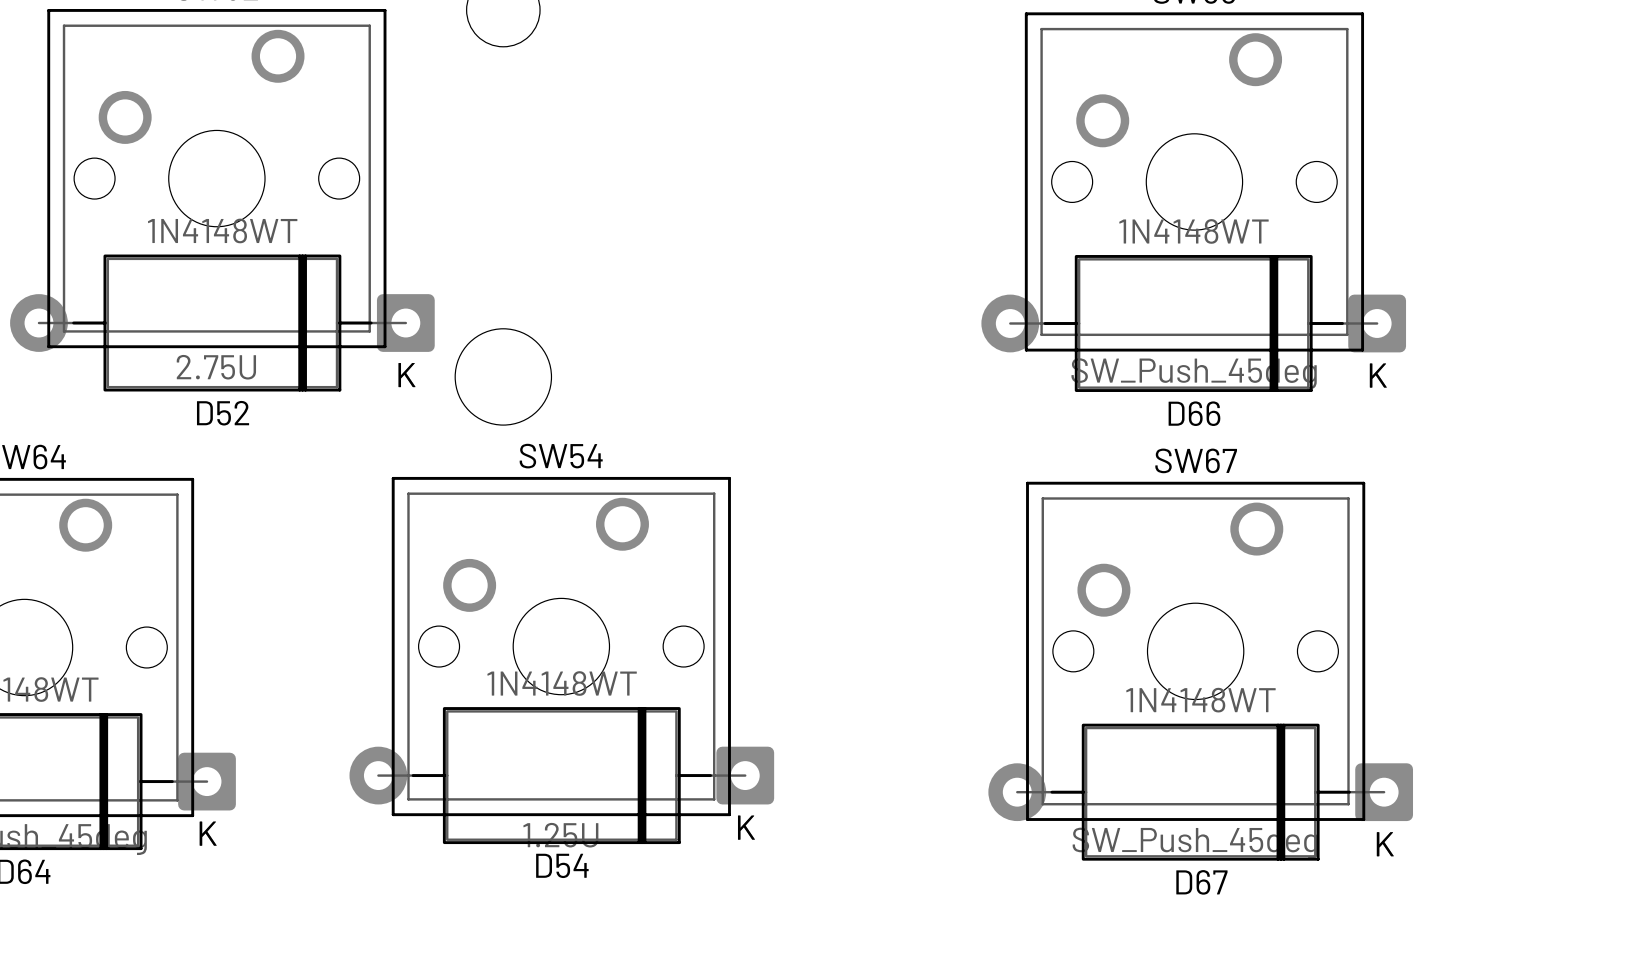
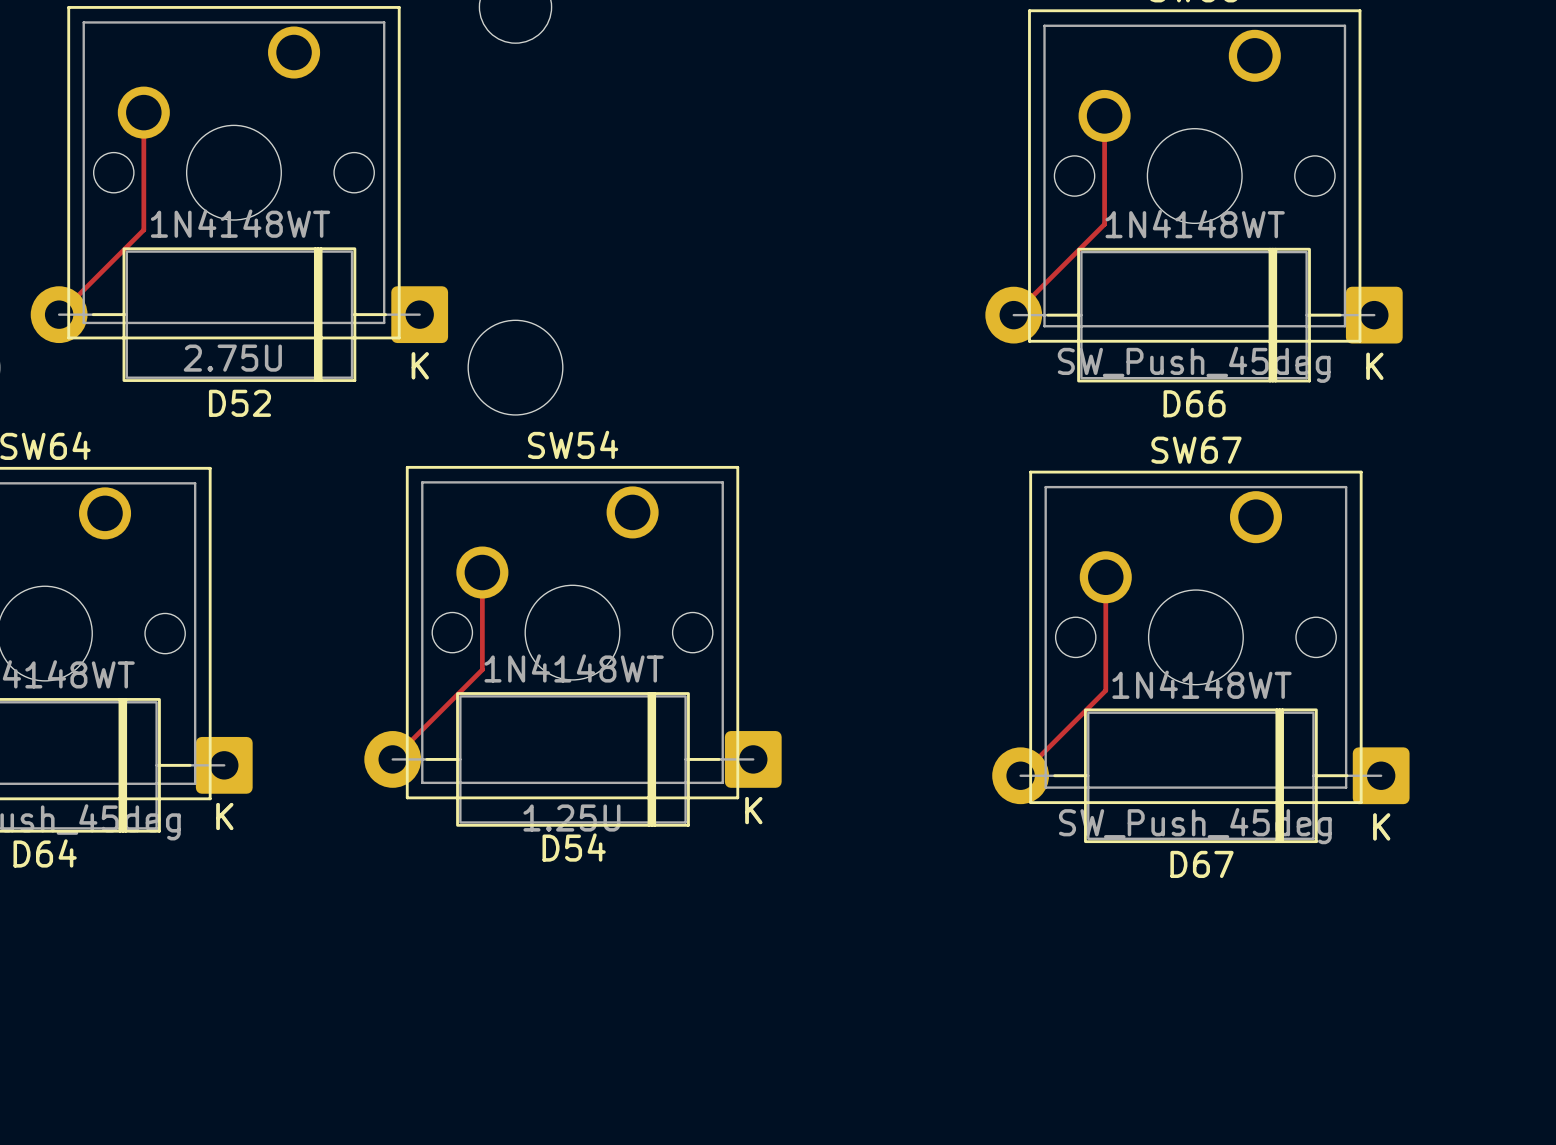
track: none -> (143, 112) (143, 229) (59, 314)
track: none -> (1104, 115) (1104, 224) (1013, 315)
track: none -> (482, 572) (482, 669) (392, 759)
track: none -> (1105, 577) (1105, 690) (1020, 775)

